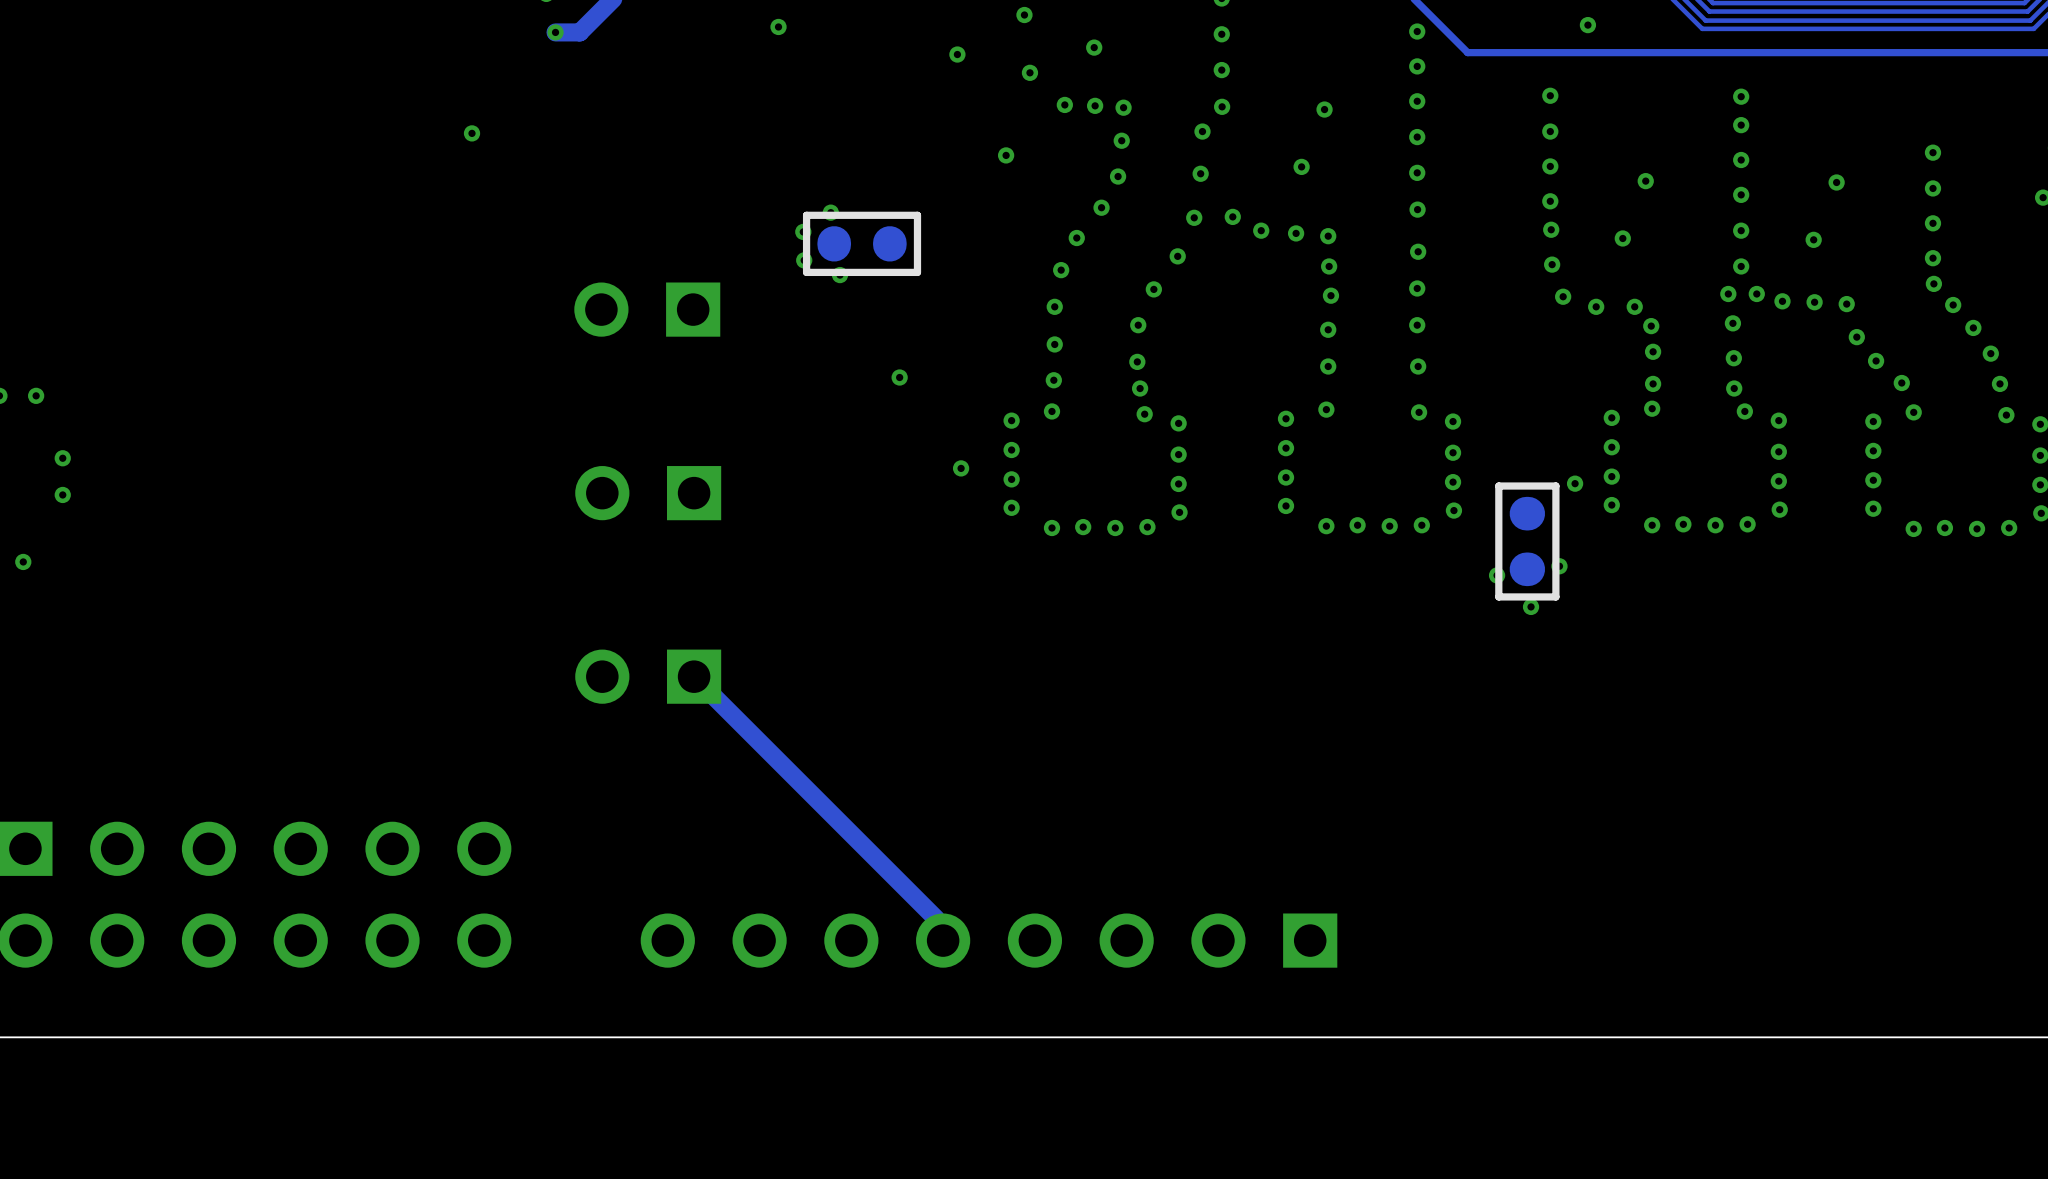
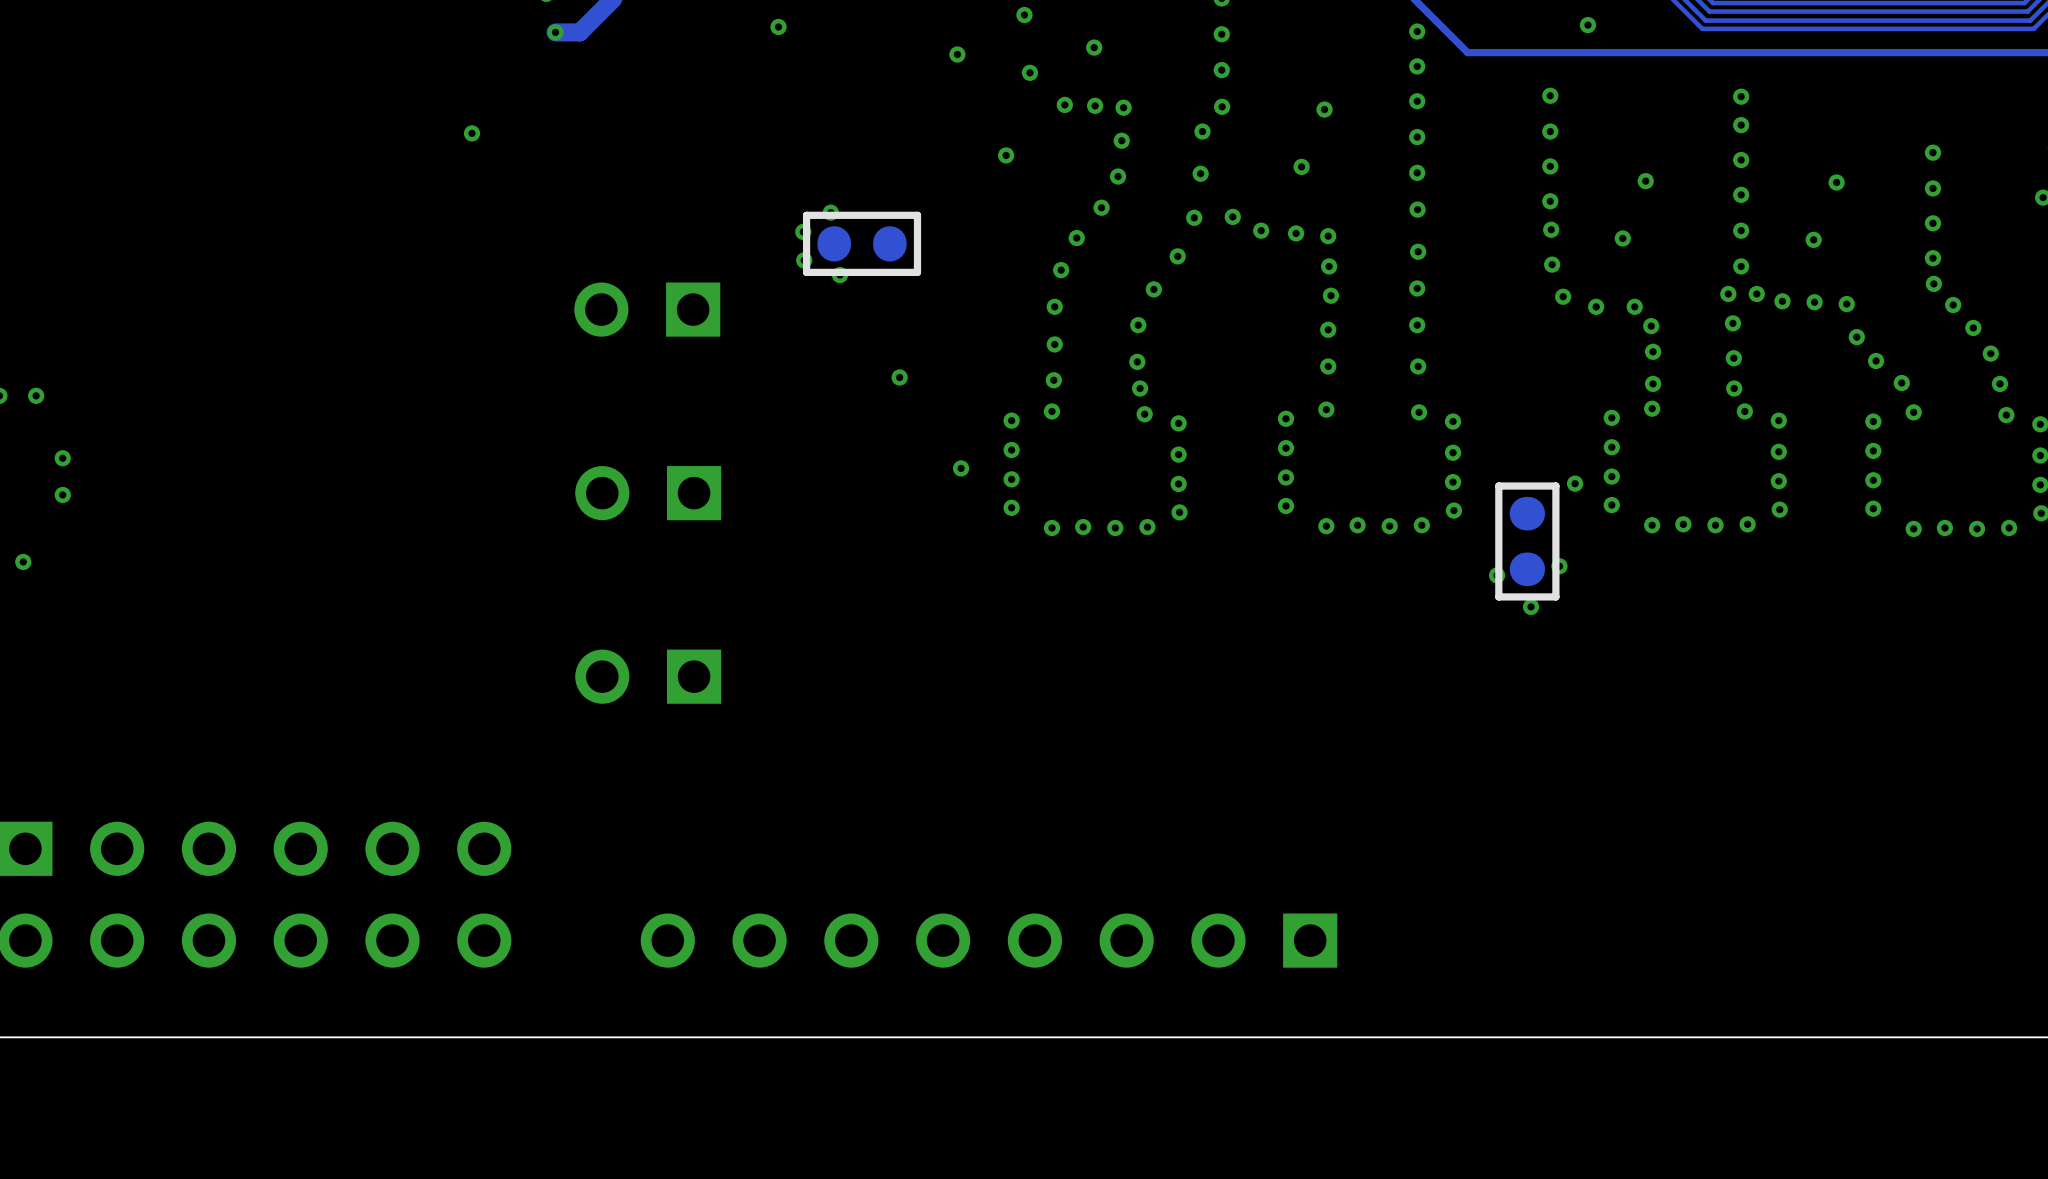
track: (694, 676) (936, 918) -> none

